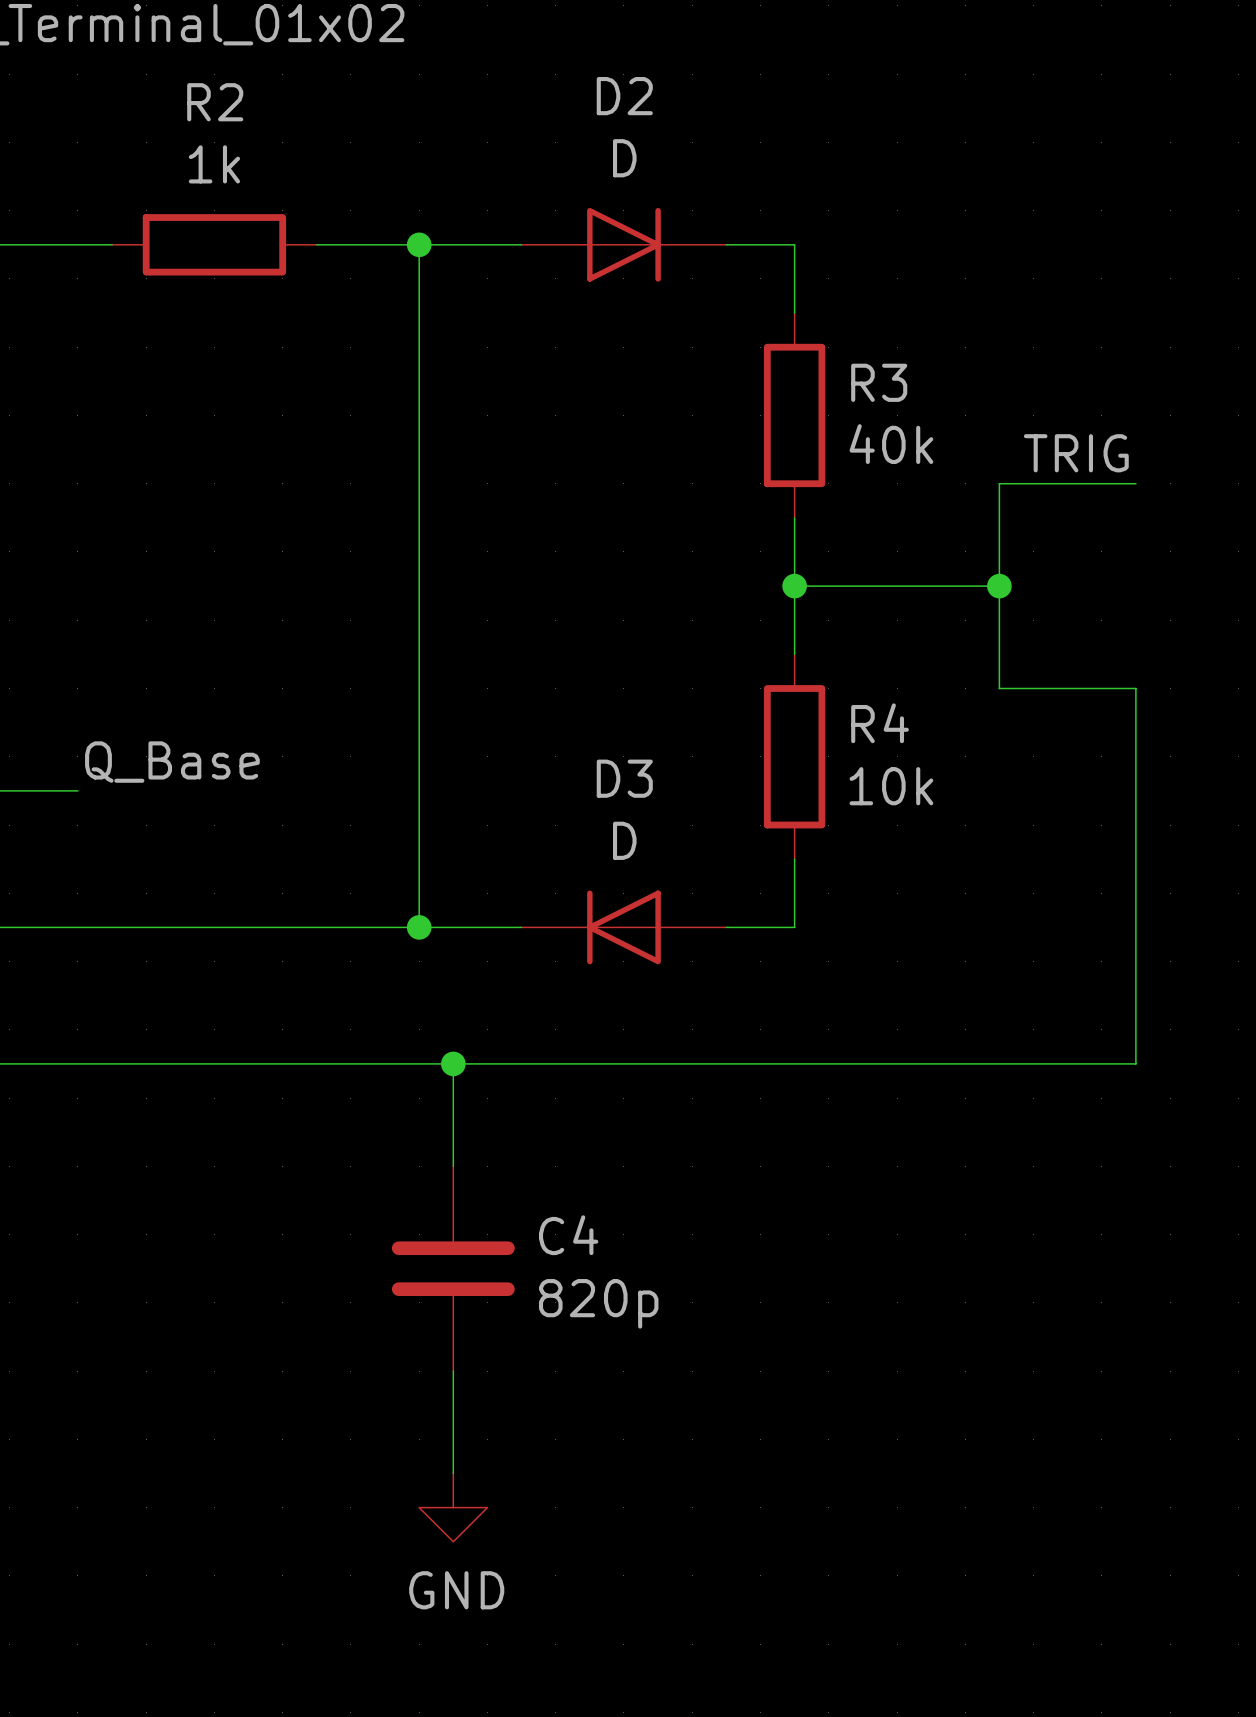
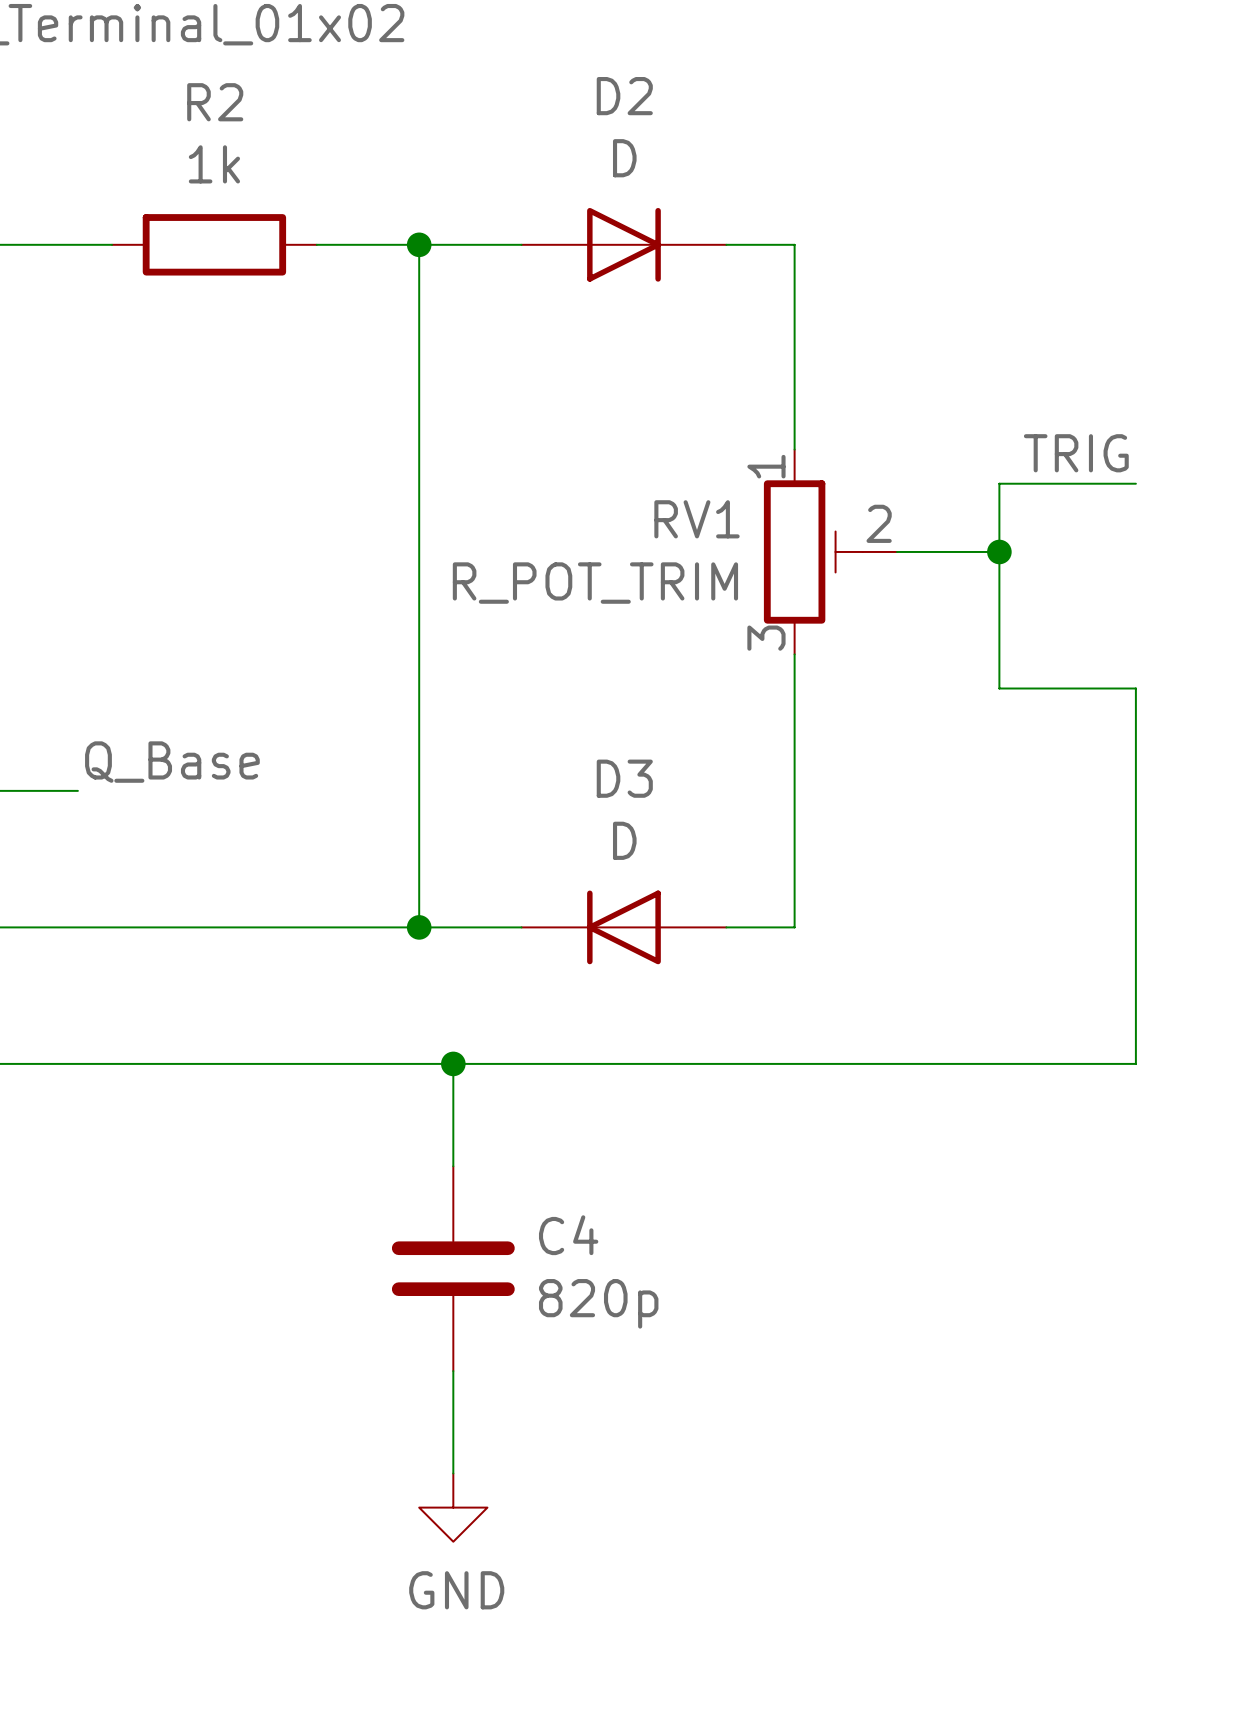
wire: none -> (794, 313) (794, 449)
R3: 40k (794, 415) -> none
wire: (794, 517) (794, 654) -> (794, 859) (794, 654)
RV1: none -> R_POT_TRIM (830, 551)
wire: none -> (897, 551) (999, 551)
wire: (794, 586) (999, 586) -> none
junction: (794, 586) -> none
junction position: (999, 586) -> (999, 551)
R4: 10k (794, 756) -> none

